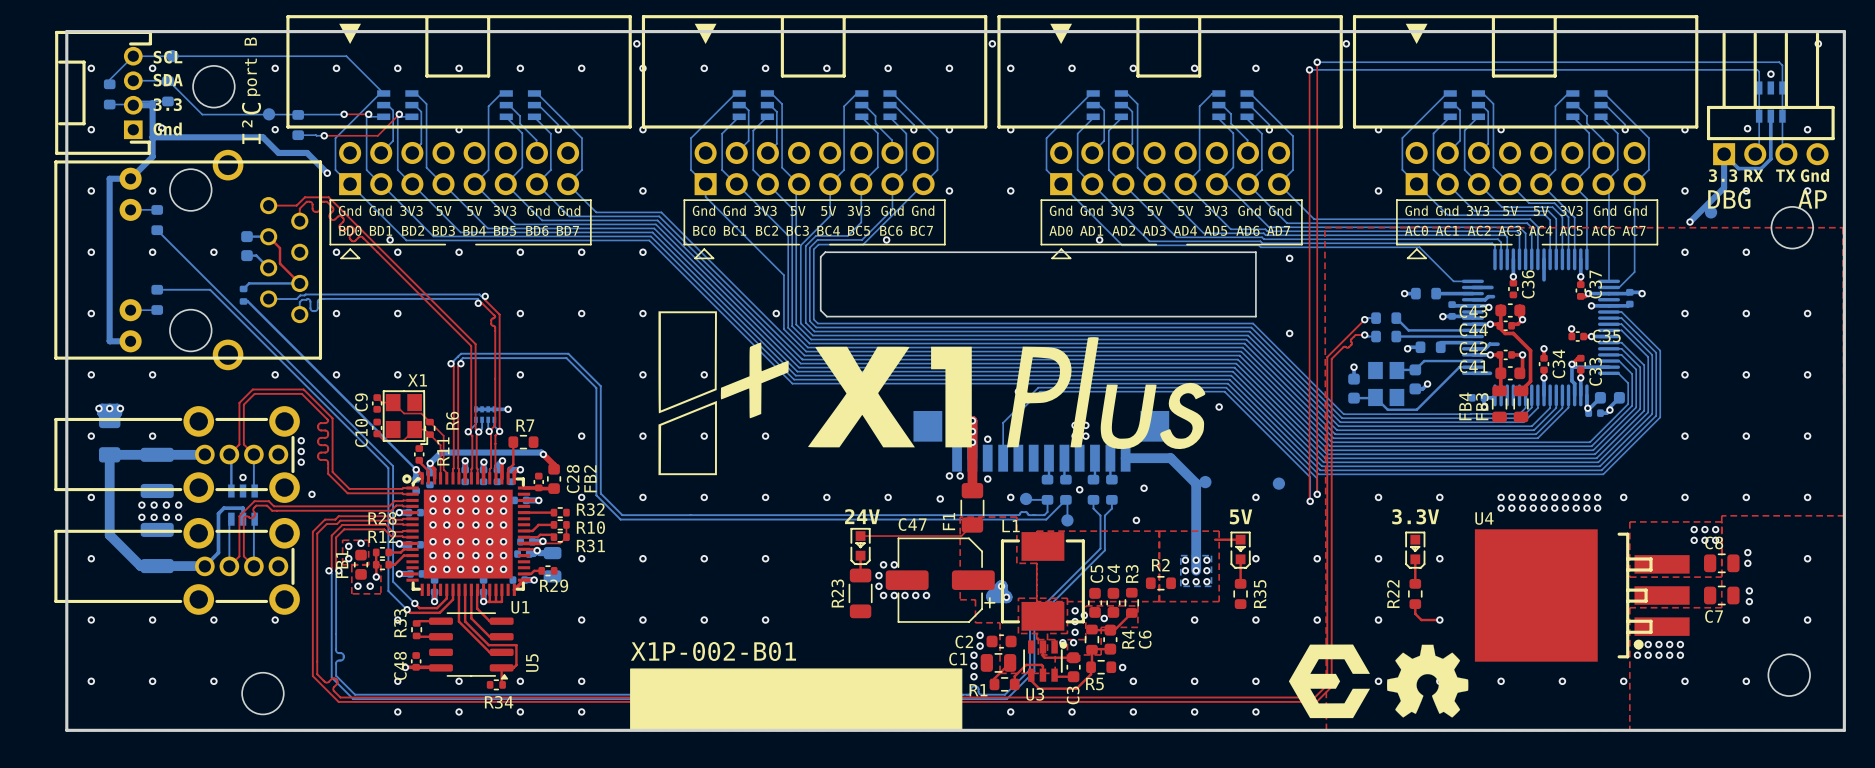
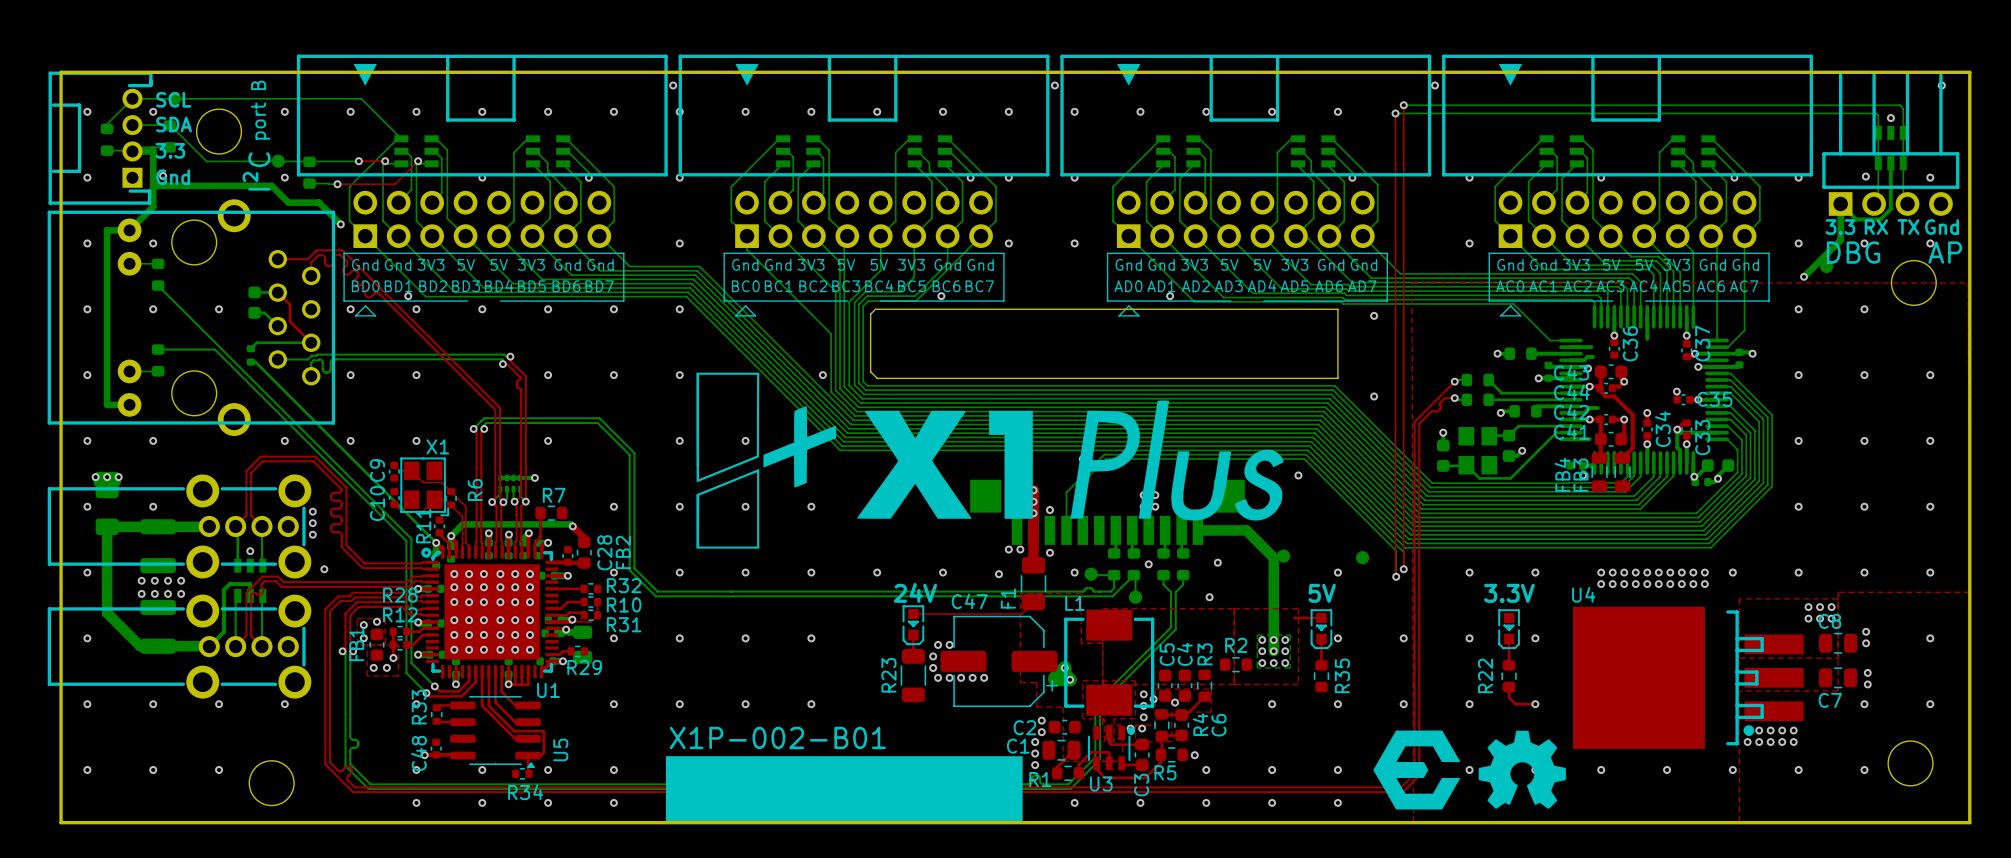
R11 name position: R11 (443, 451) -> R11 (423, 526)

